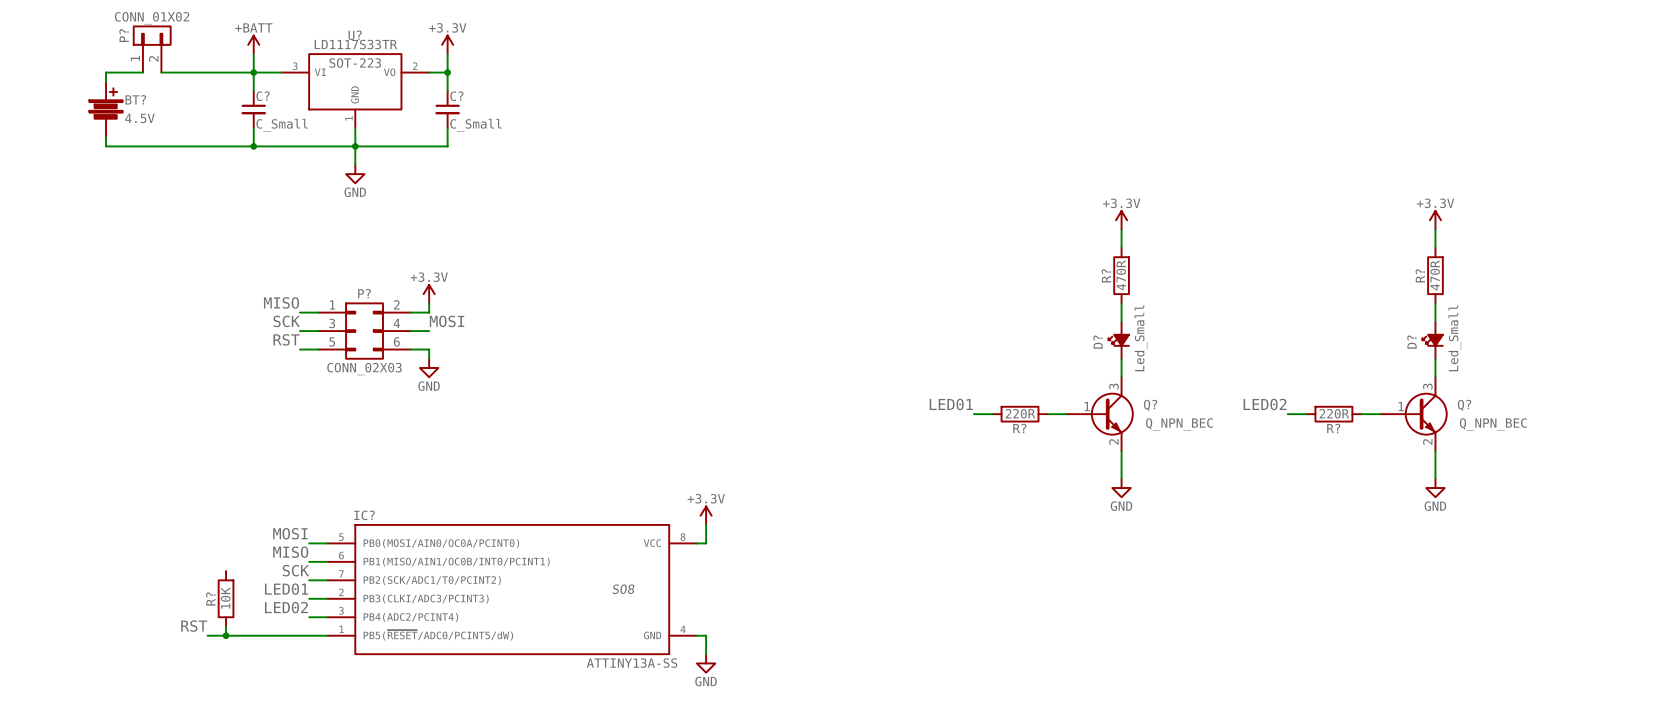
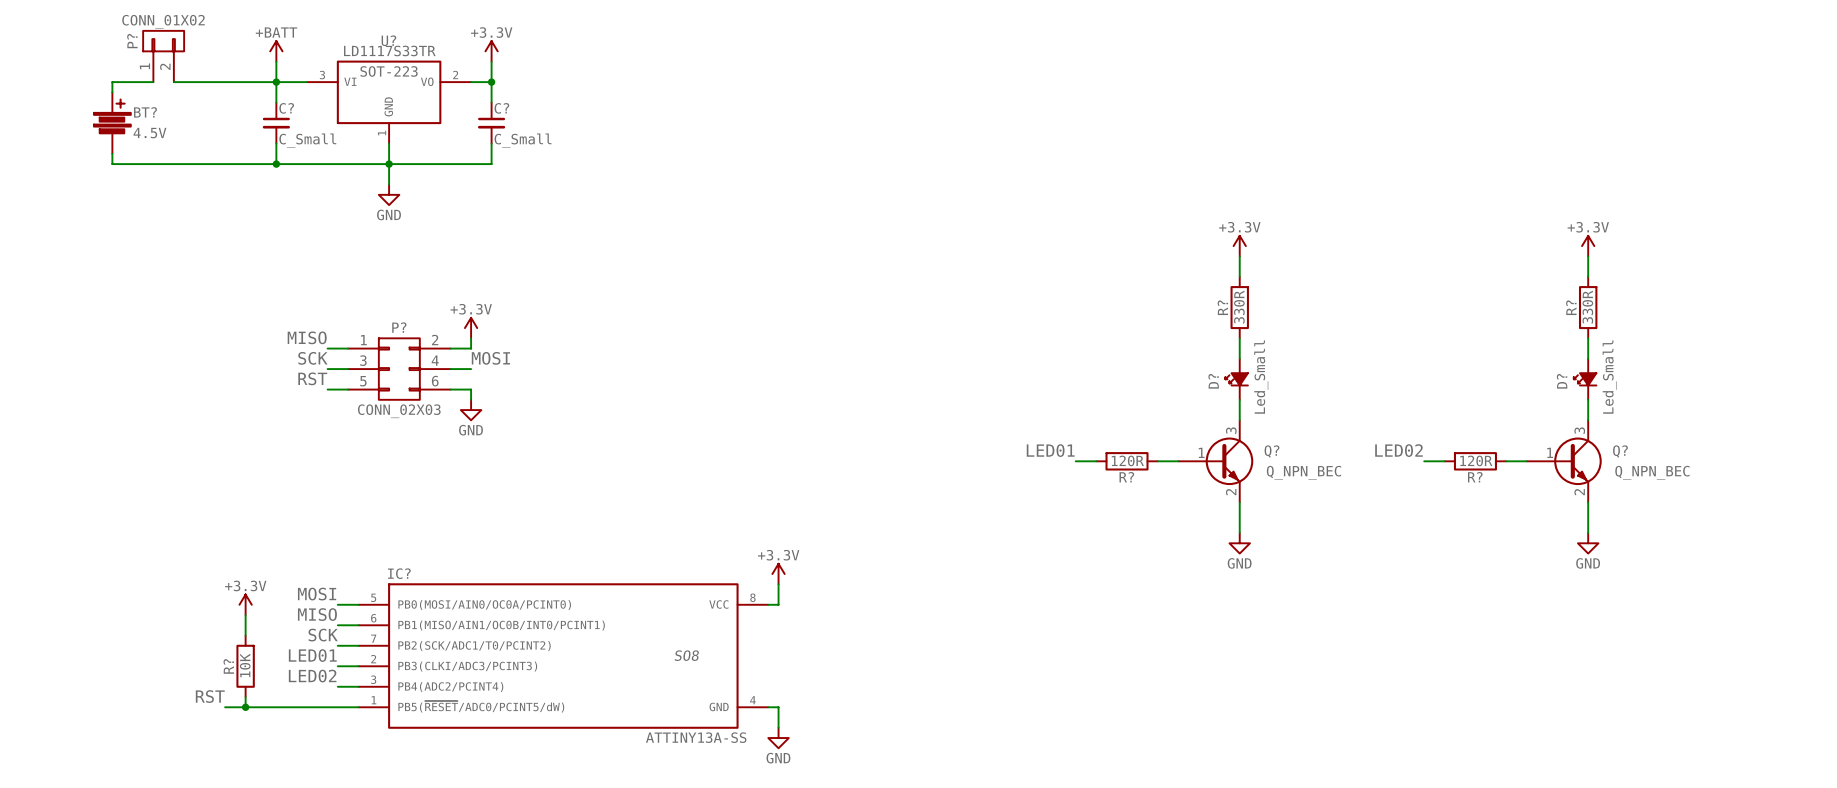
R? value: 470R (1121, 275) -> 330R (1239, 307)
R? value: 470R (1435, 275) -> 330R (1587, 307)
R? value: 220R (1020, 413) -> 120R (1127, 460)
R? value: 220R (1334, 413) -> 120R (1476, 460)
power symbol: none -> +3.3V (245, 604)
wire: none -> (245, 615) (245, 635)

